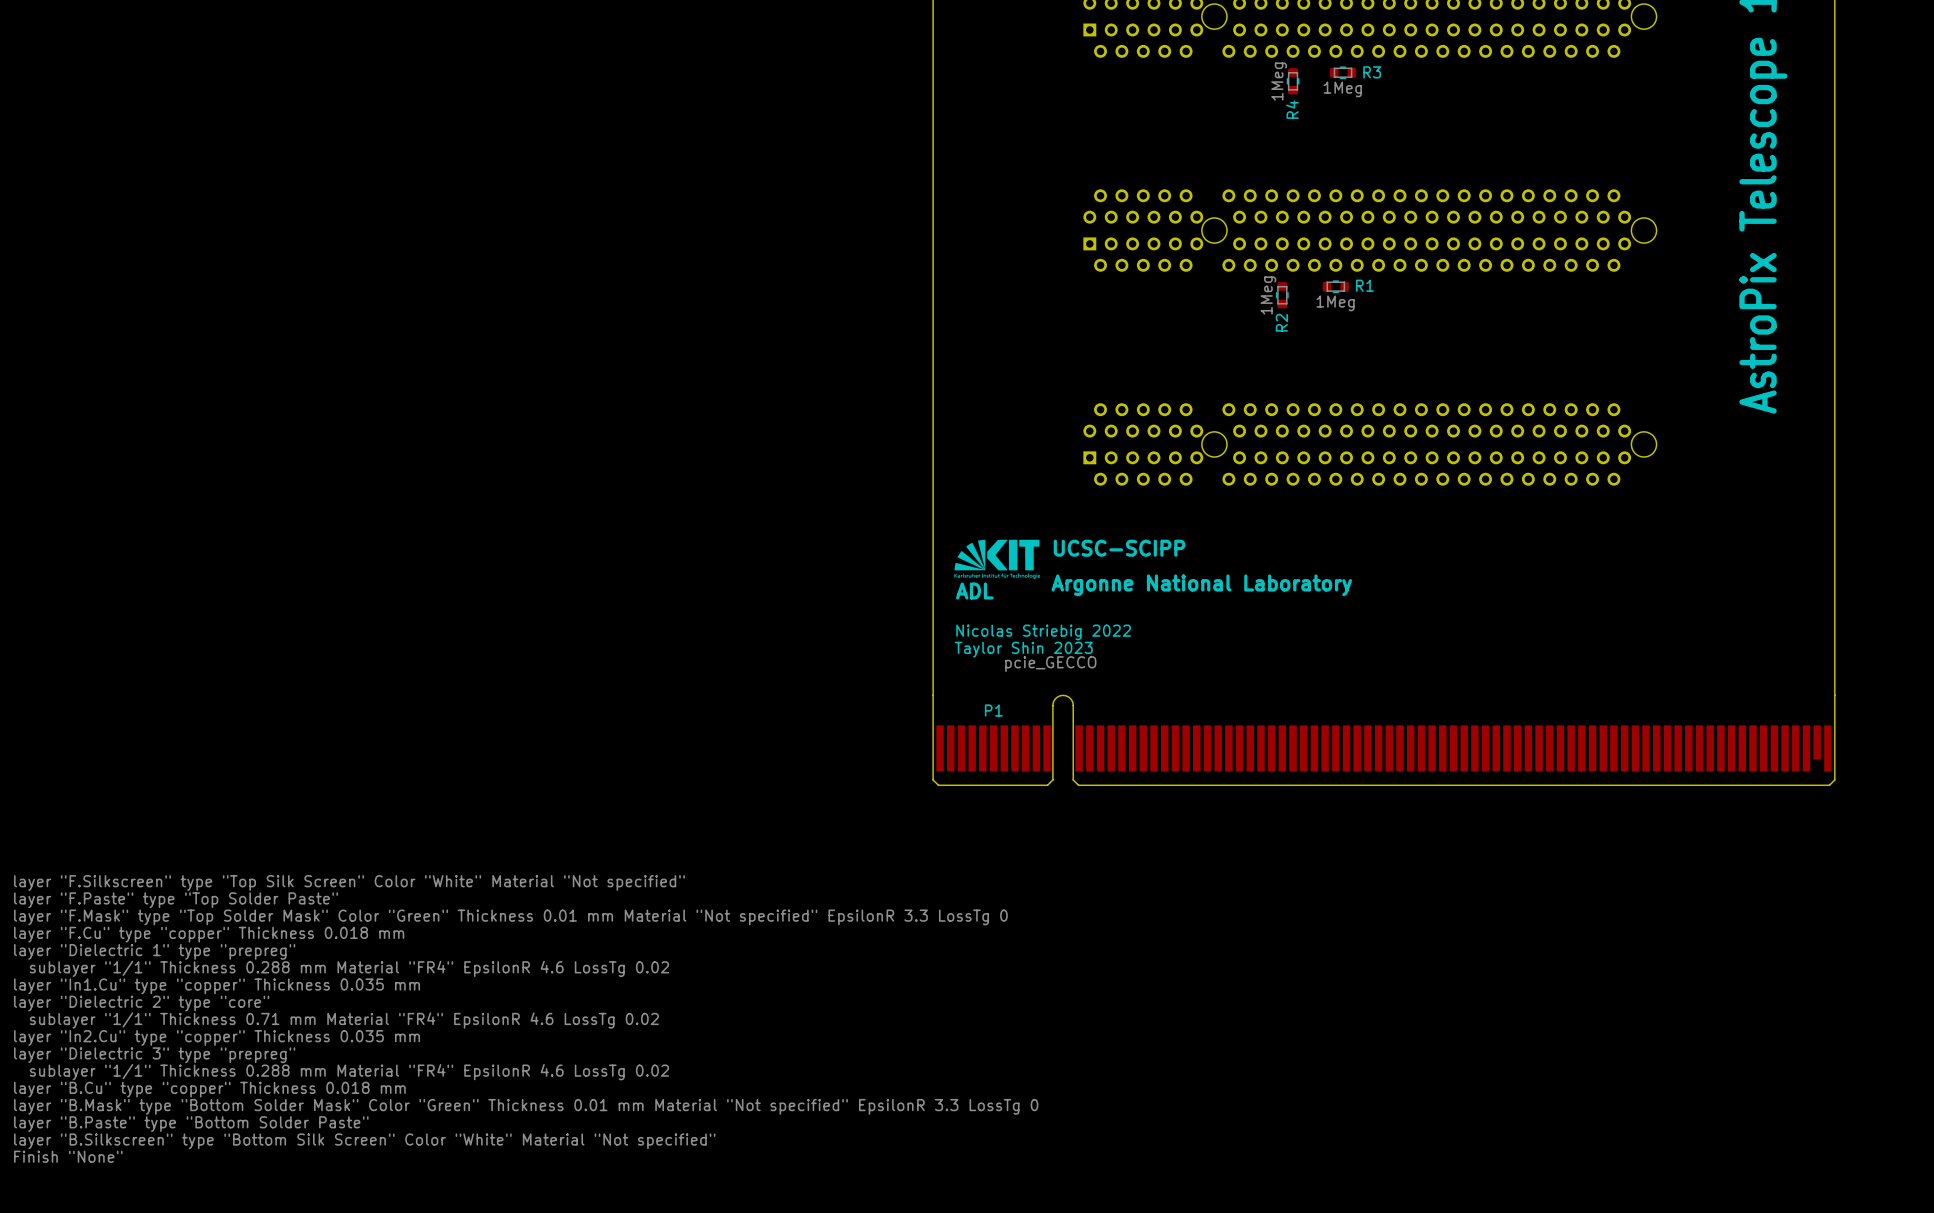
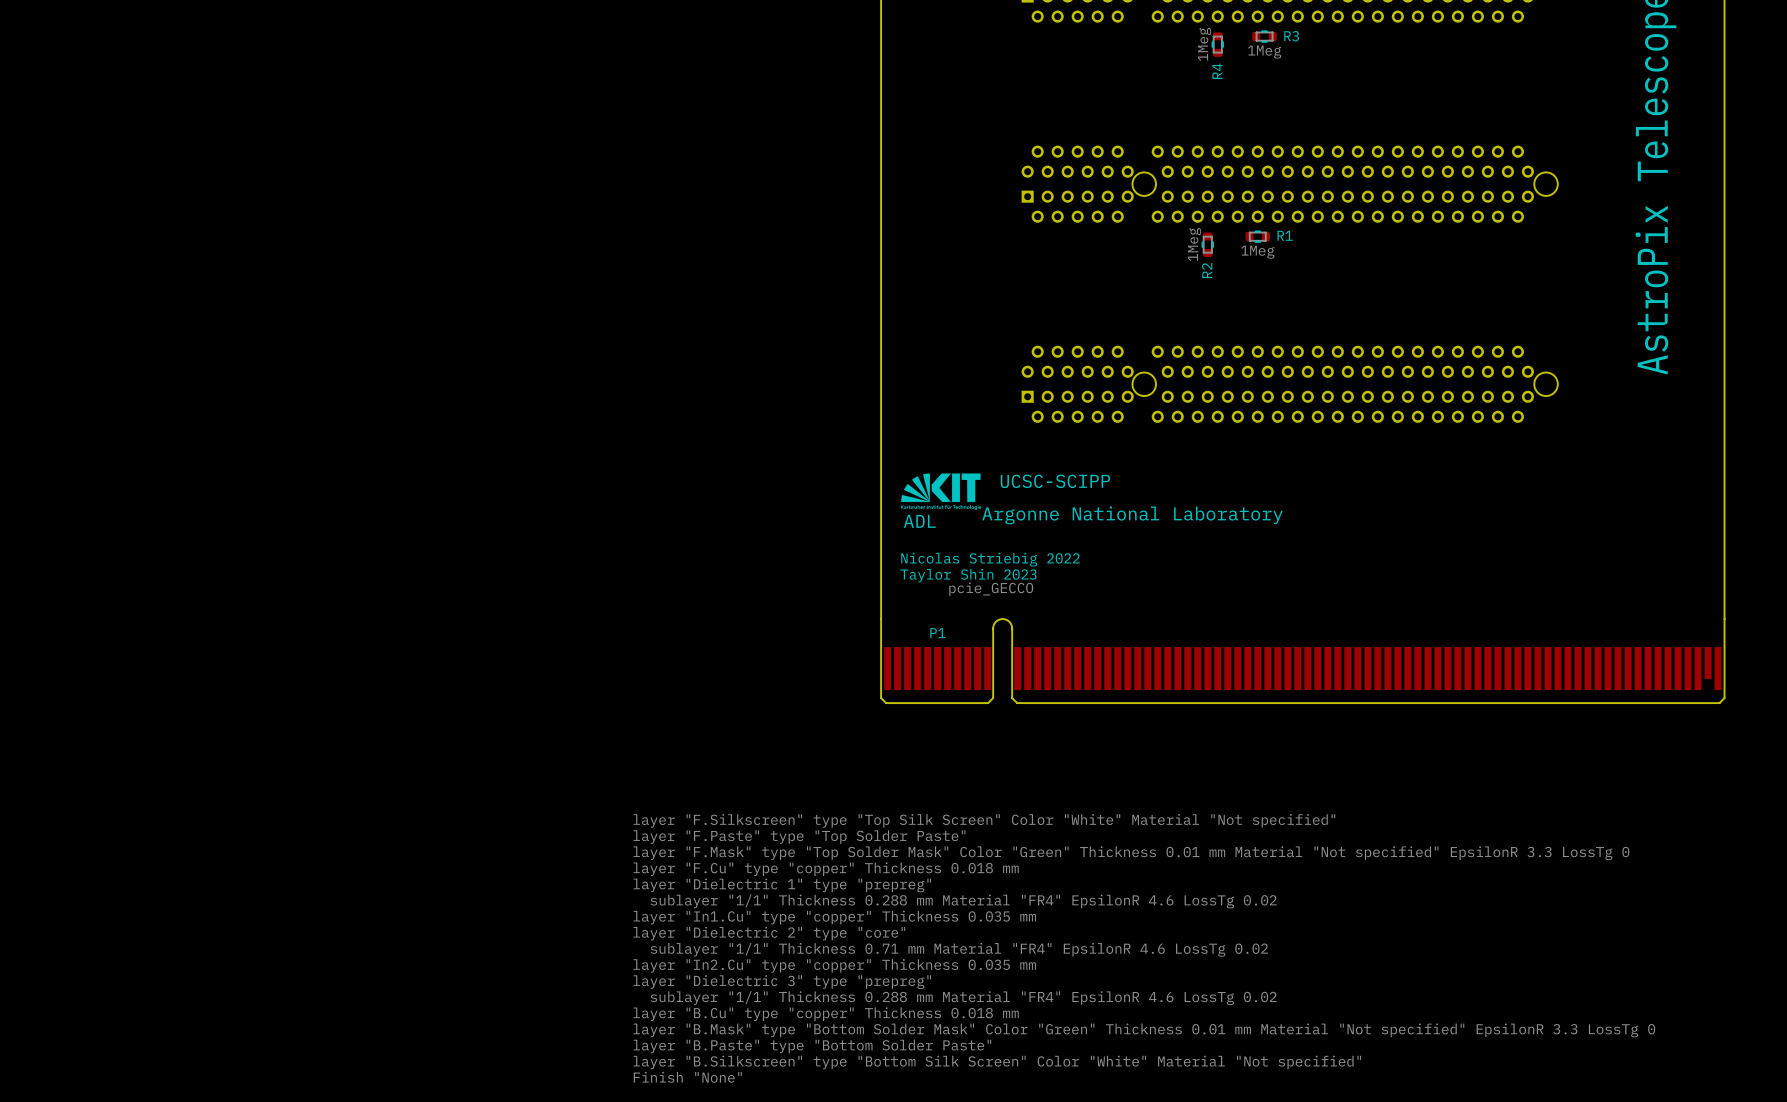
text: layer "F.Silkscreen" type "Top Silk Screen" Color "White" Material "Not specified" (349, 882) -> none
text: layer "F.Paste" type "Top Solder Paste" (176, 900) -> none
text: none -> layer "F.Silkscreen" type "Top Silk Screen" Color "White" Material "Not specified" (984, 820)
text: layer "F.Mask" type "Top Solder Mask" Color "Green" Thickness 0.01 mm Material "Not specified" EpsilonR 3.3 LossTg 0 (510, 917) -> none
text: none -> layer "F.Paste" type "Top Solder Paste" (799, 837)
text: layer "F.Cu" type "copper" Thickness 0.018 mm (209, 934) -> none
text: none -> layer "F.Mask" type "Top Solder Mask" Color "Green" Thickness 0.01 mm Material "Not specified" EpsilonR 3.3 LossTg 0 (1131, 853)
text: layer "Dielectric 1" type "prepreg" (154, 951) -> none
text: none -> layer "F.Cu" type "copper" Thickness 0.018 mm (826, 869)
text: sublayer "1/1" Thickness 0.288 mm Material "FR4" EpsilonR 4.6 LossTg 0.02 (349, 968) -> none
text: none -> layer "Dielectric 1" type "prepreg" (782, 885)
text: layer "In1.Cu" type "copper" Thickness 0.035 mm (217, 986) -> none
text: none -> sublayer "1/1" Thickness 0.288 mm Material "FR4" EpsilonR 4.6 LossTg 0.02 (963, 901)
text: layer "Dielectric 2" type "core" (141, 1003) -> none
text: none -> layer "In1.Cu" type "copper" Thickness 0.035 mm (834, 917)
text: sublayer "1/1" Thickness 0.71 mm Material "FR4" EpsilonR 4.6 LossTg 0.02 (344, 1020) -> none
text: none -> layer "Dielectric 2" type "core" (769, 933)
text: layer "In2.Cu" type "copper" Thickness 0.035 mm (217, 1037) -> none
text: none -> sublayer "1/1" Thickness 0.71 mm Material "FR4" EpsilonR 4.6 LossTg 0.02 (959, 949)
text: layer "Dielectric 3" type "prepreg" (154, 1055) -> none
text: none -> layer "In2.Cu" type "copper" Thickness 0.035 mm (834, 965)
text: sublayer "1/1" Thickness 0.288 mm Material "FR4" EpsilonR 4.6 LossTg 0.02 (349, 1072) -> none
text: none -> layer "Dielectric 3" type "prepreg" (782, 982)
text: layer "B.Cu" type "copper" Thickness 0.018 mm (209, 1089) -> none
text: none -> sublayer "1/1" Thickness 0.288 mm Material "FR4" EpsilonR 4.6 LossTg 0.02 (963, 998)
text: layer "B.Mask" type "Bottom Solder Mask" Color "Green" Thickness 0.01 mm Material "Not specified" EpsilonR 3.3 LossTg 0 (526, 1106) -> none
text: none -> layer "B.Cu" type "copper" Thickness 0.018 mm (826, 1014)
text: layer "B.Paste" type "Bottom Solder Paste" (191, 1124) -> none
text: none -> layer "B.Mask" type "Bottom Solder Mask" Color "Green" Thickness 0.01 mm Material "Not specified" EpsilonR 3.3 LossTg 0 (1144, 1030)
text: layer "B.Silkscreen" type "Bottom Silk Screen" Color "White" Material "Not specified" (364, 1141) -> none
text: none -> layer "B.Paste" type "Bottom Solder Paste" (812, 1046)
text: Finish "None" (68, 1156) -> none
text: none -> layer "B.Silkscreen" type "Bottom Silk Screen" Color "White" Material "Not specified" (997, 1062)
text: none -> Finish "None" (687, 1077)

